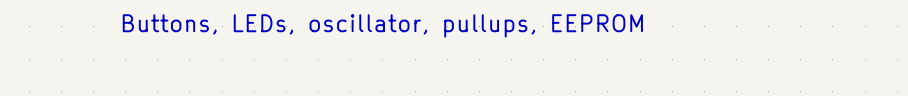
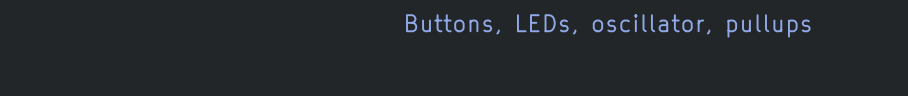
text: Buttons, LEDs, oscillator, pullups, EEPROM (382, 25) -> Buttons, LEDs, oscillator, pullups (608, 25)

